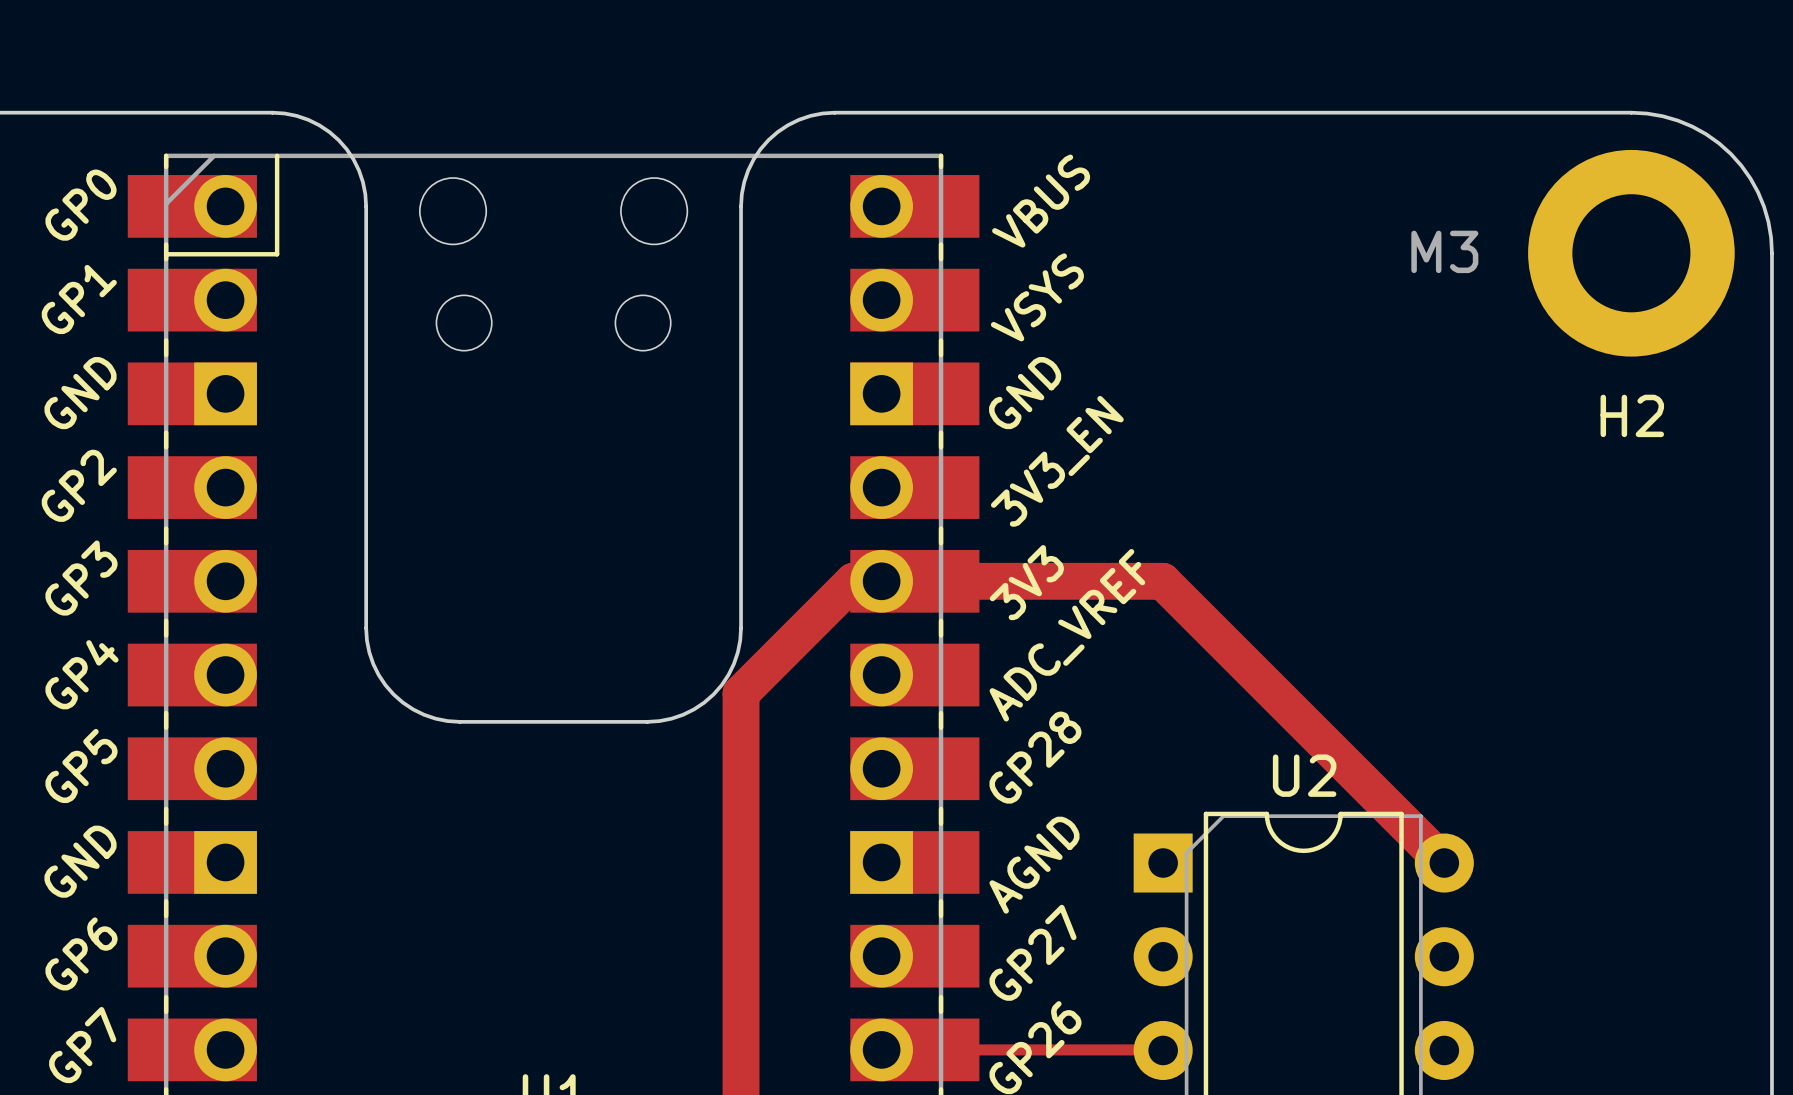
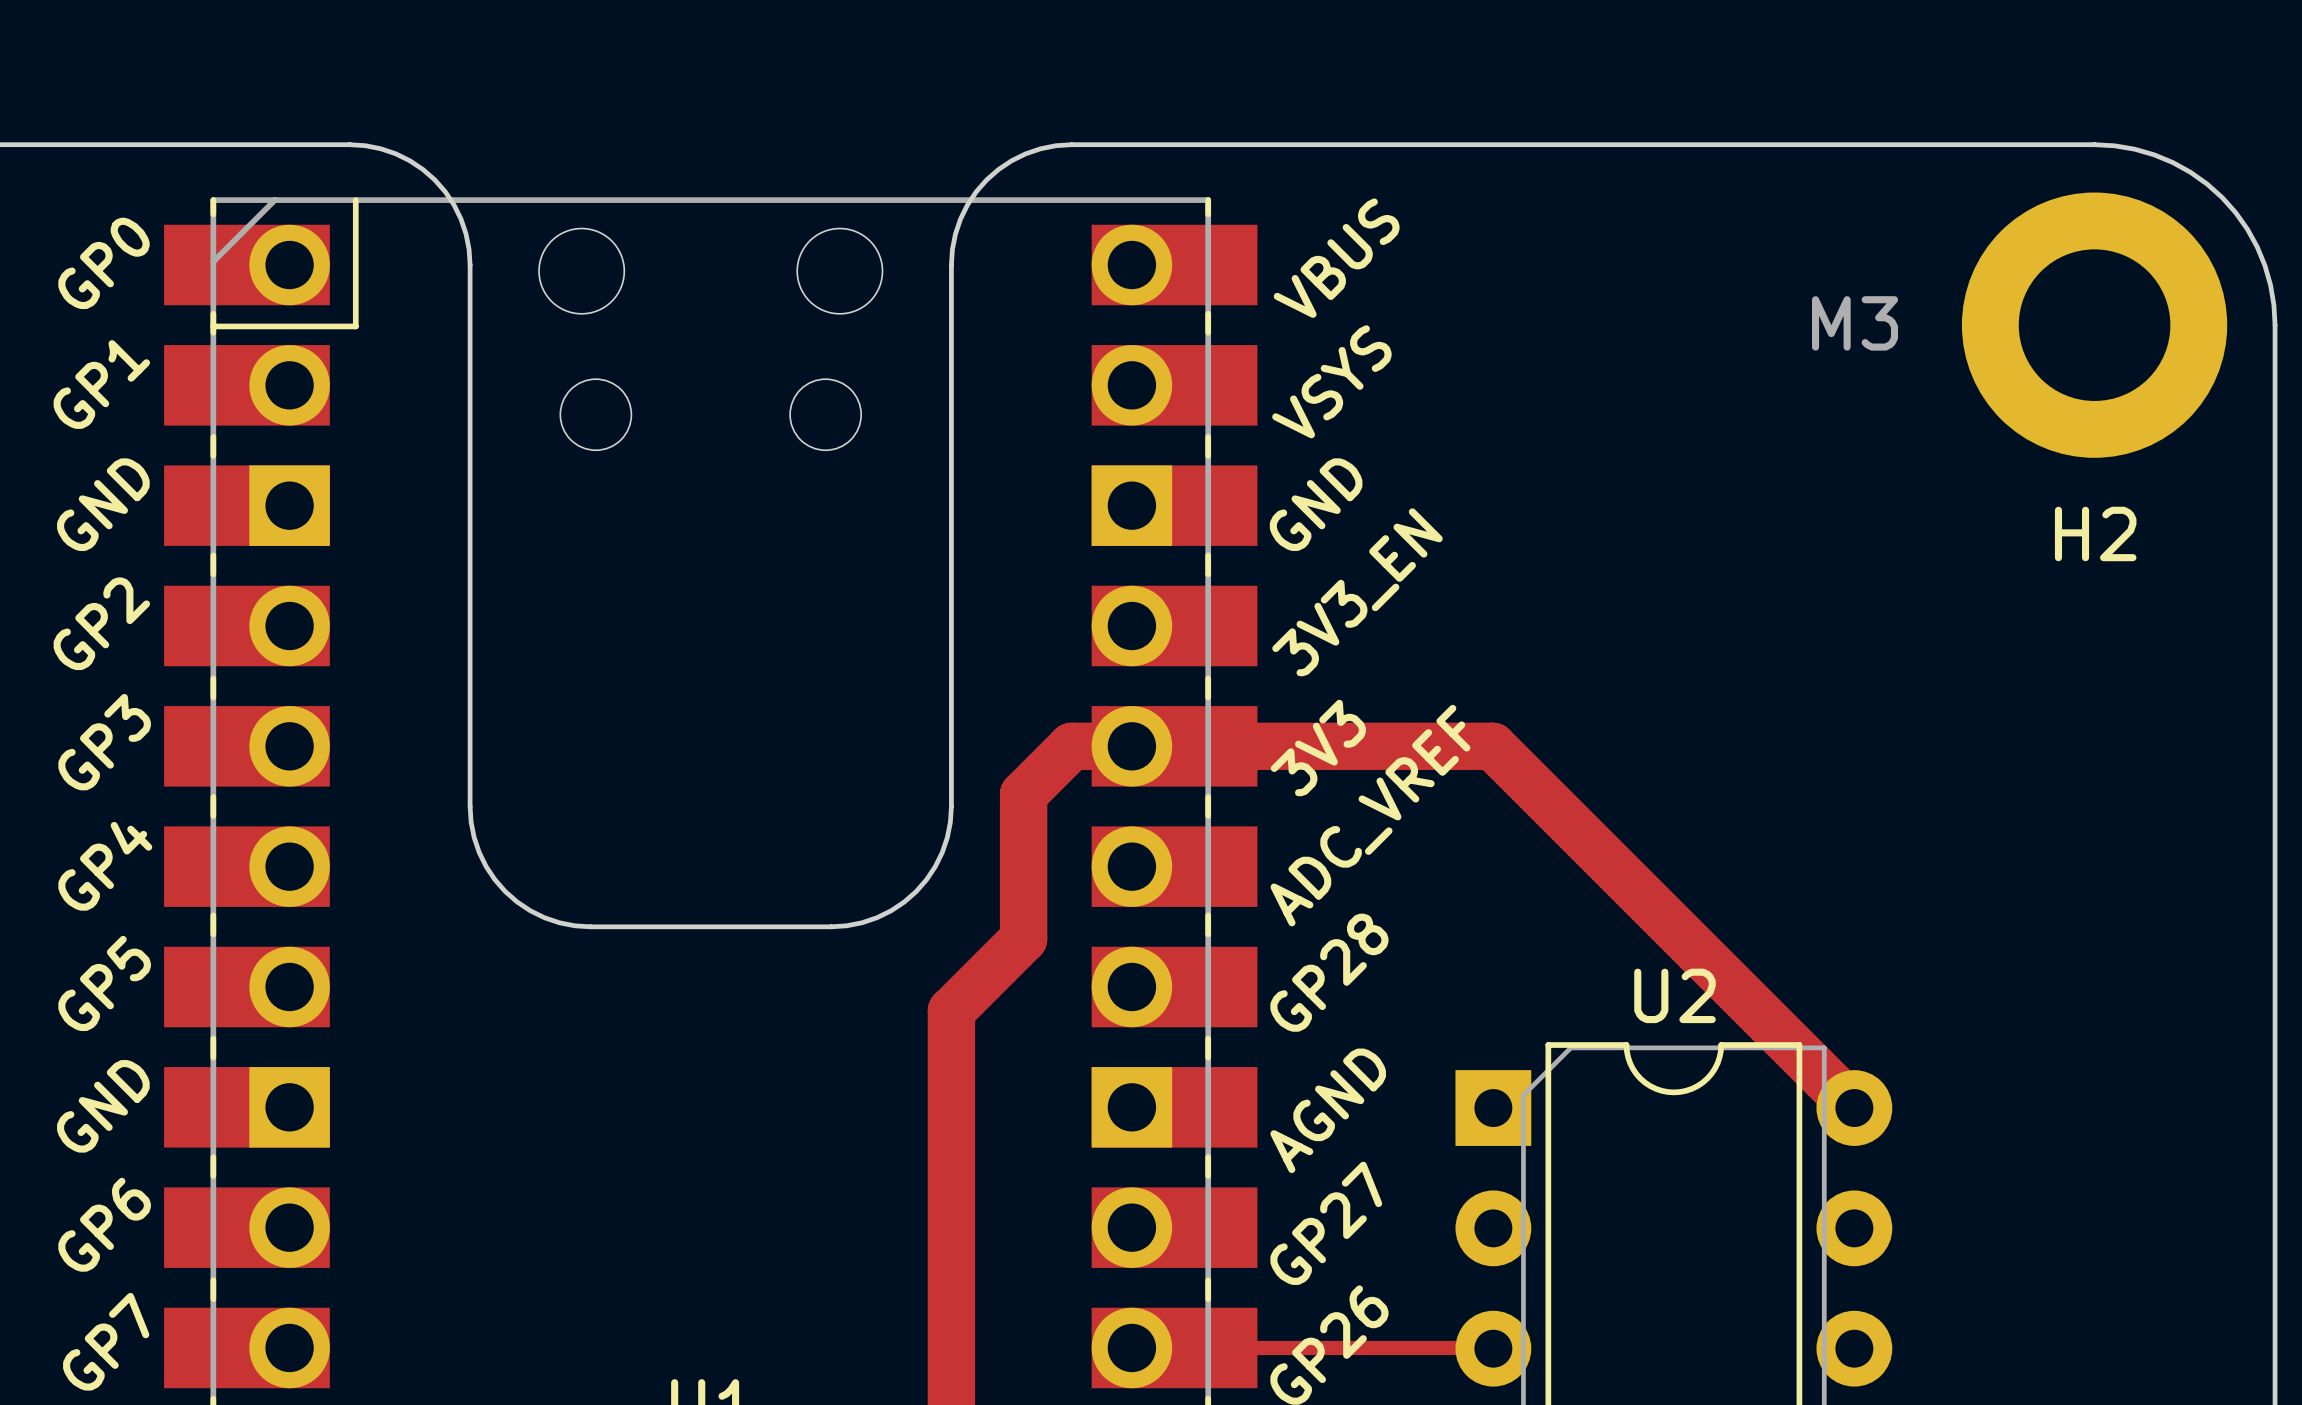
track: (853, 581) (741, 693) (741, 787) -> (1095, 746) (1071, 746) (1023, 794) (1023, 938) (951, 1011)

